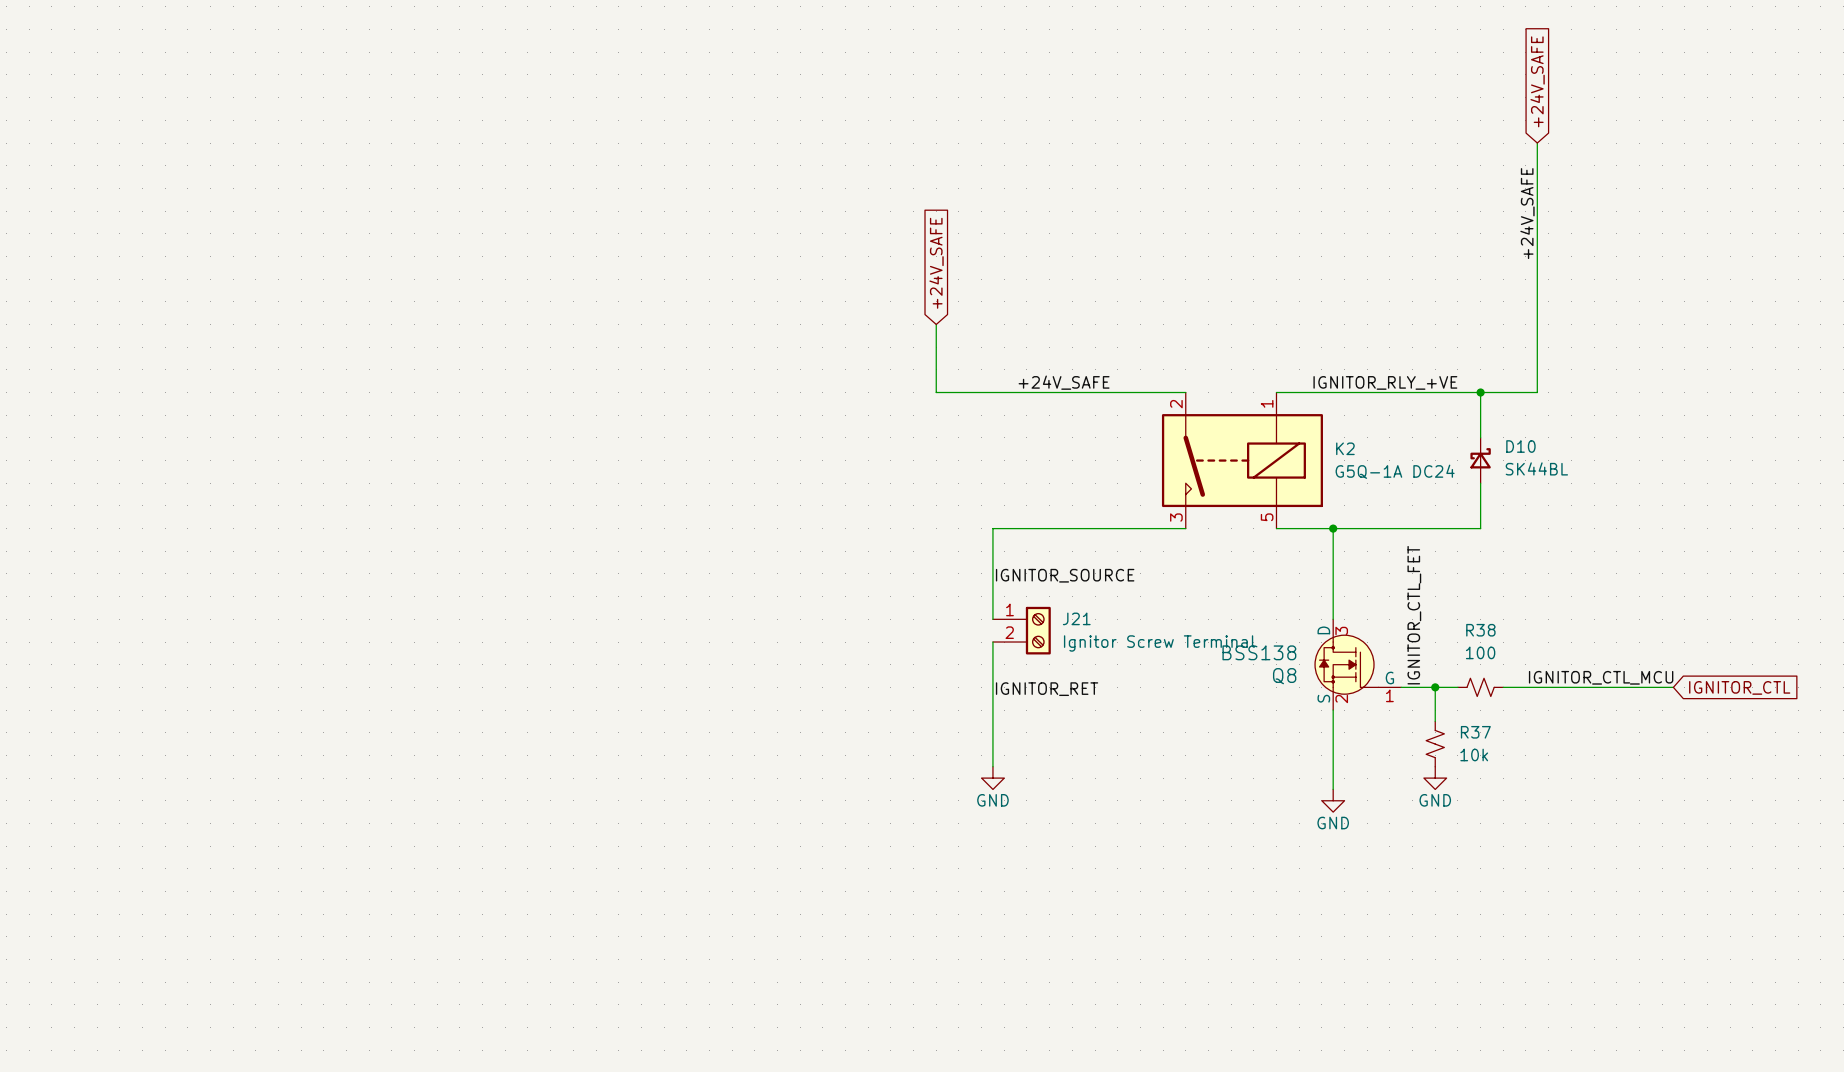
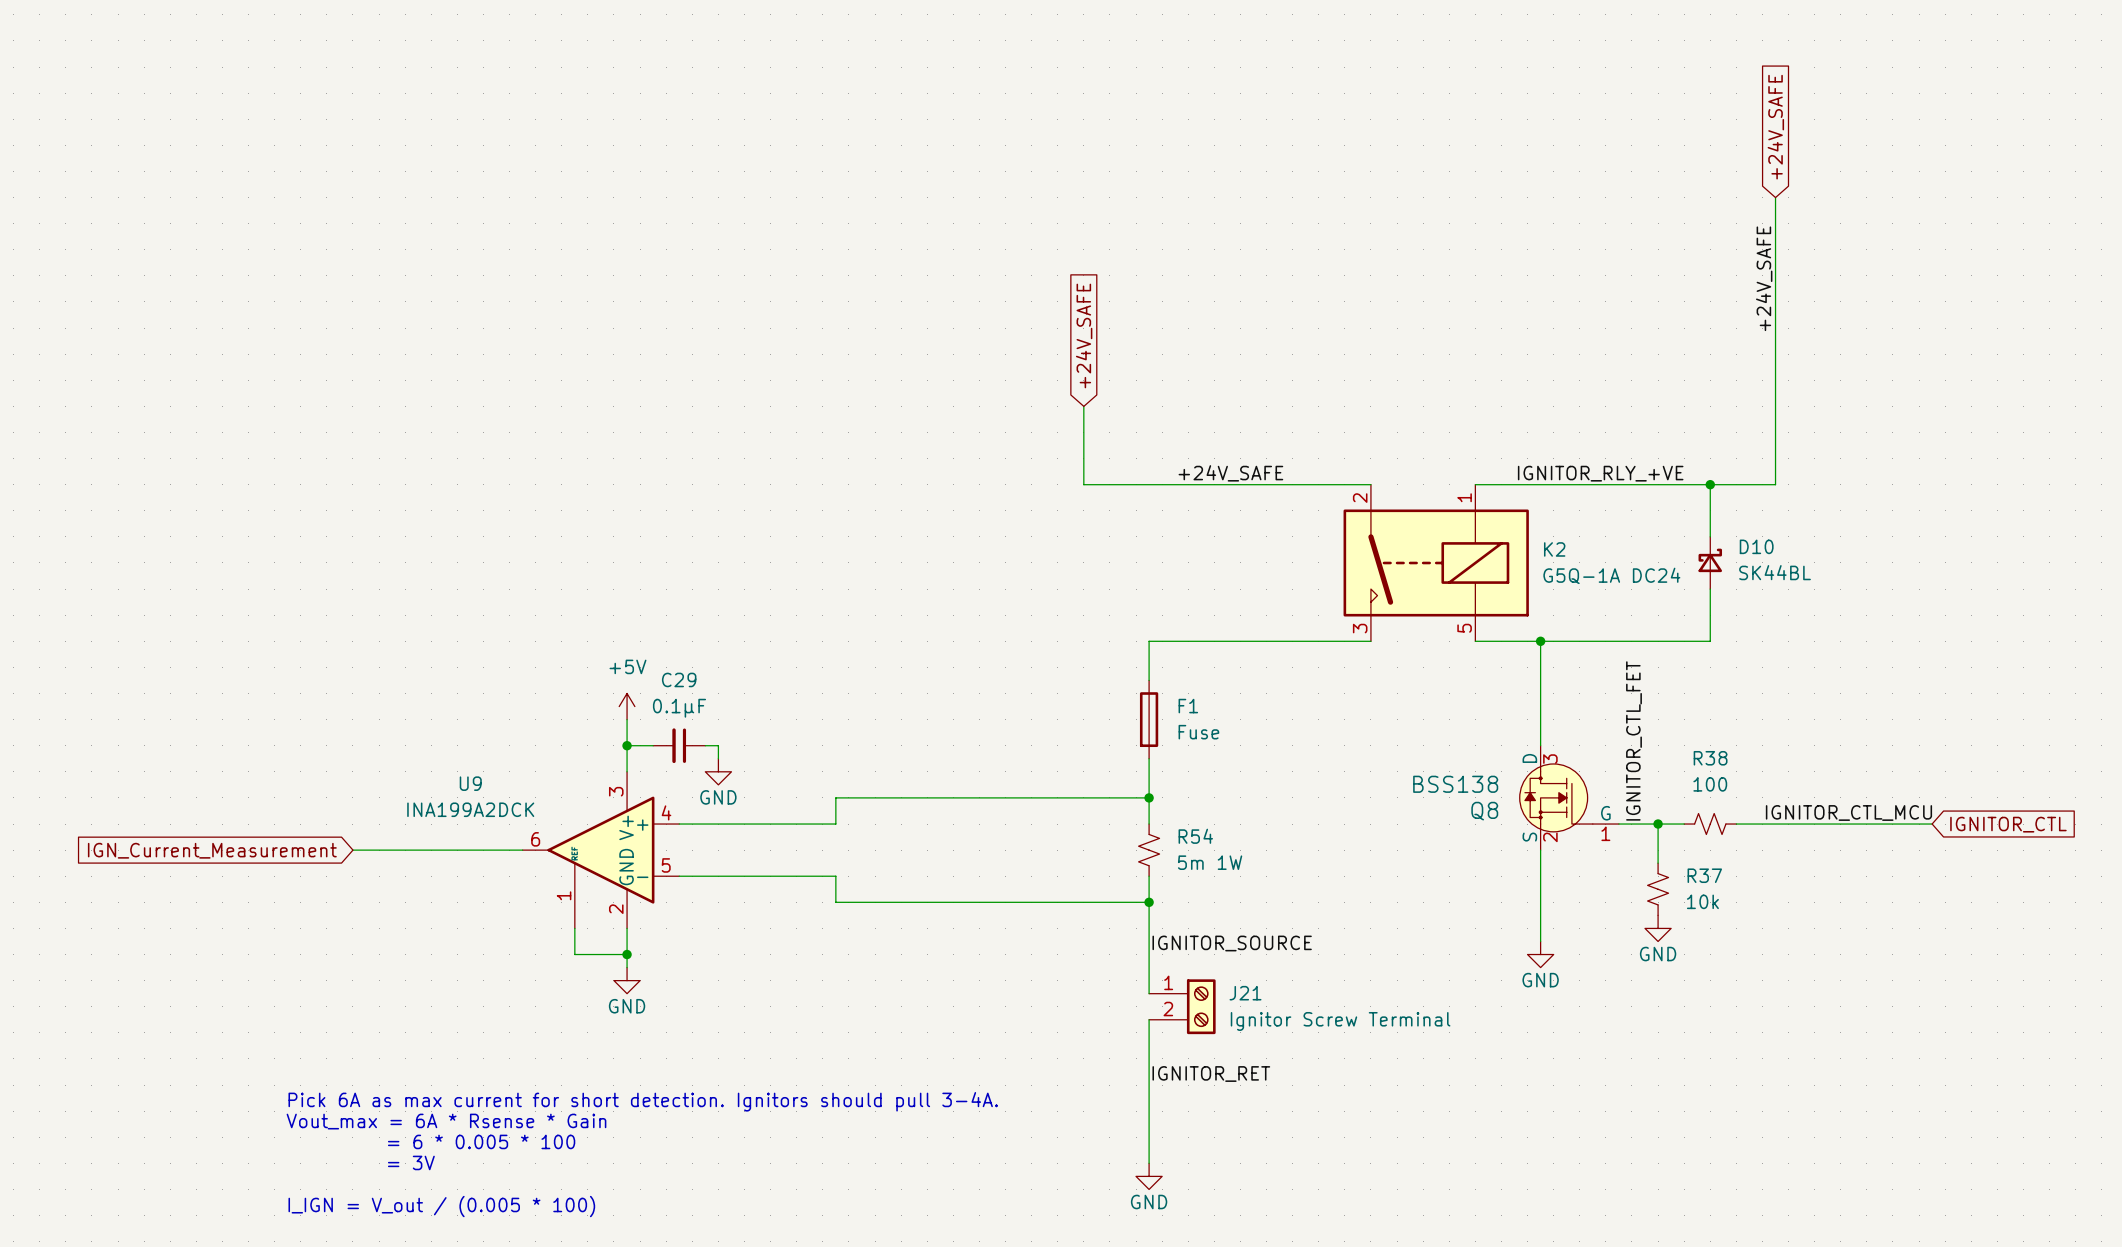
label position: IGNITOR_SOURCE (1065, 575) -> IGNITOR_SOURCE (1232, 943)
power symbol: none -> +5V (627, 706)
wire: none -> (627, 719) (627, 771)
F1: none -> Fuse (1149, 719)
wire: none -> (627, 745) (653, 745)
junction: none -> (627, 745)
C29: none -> 0.1μF (679, 745)
wire: none -> (705, 745) (718, 745) (718, 758)
wire: none -> (1149, 758) (1149, 771)
J21 position: (1021, 630) -> (1182, 1006)
power symbol: none -> GND (718, 771)
wire: none -> (1149, 797) (835, 797) (835, 824) (679, 824)
junction: none -> (1149, 797)
label position: IGNITOR_RET (1047, 689) -> IGNITOR_RET (1211, 1074)
global label: none -> IGN_Current_Measurement (212, 850)
wire: none -> (352, 850) (522, 850)
U9: none -> INA199A2DCK (600, 850)
R54: none -> 5m 1W (1149, 850)
wire: none -> (679, 876) (835, 876) (835, 902) (1149, 902)
junction: none -> (1149, 902)
wire: none -> (1149, 915) (1149, 993)
wire: none -> (574, 928) (574, 954) (627, 954)
wire: none -> (627, 928) (627, 967)
power symbol: GND (992, 778) -> none
junction: none -> (627, 954)
power symbol: none -> GND (627, 980)
wire: none -> (1149, 1019) (1149, 1163)
text: none -> Pick 6A as max current for short detection. Ignitors should pull 3-4A. (643, 1101)
text: none -> Vout_max = 6A * Rsense * Gain (446, 1121)
text: none -> = 6 * 0.005 * 100 (481, 1141)
text: none -> = 3V (411, 1162)
power symbol: none -> GND (1149, 1176)
text: none -> I_IGN = V_out / (0.005 * 100) (441, 1206)

